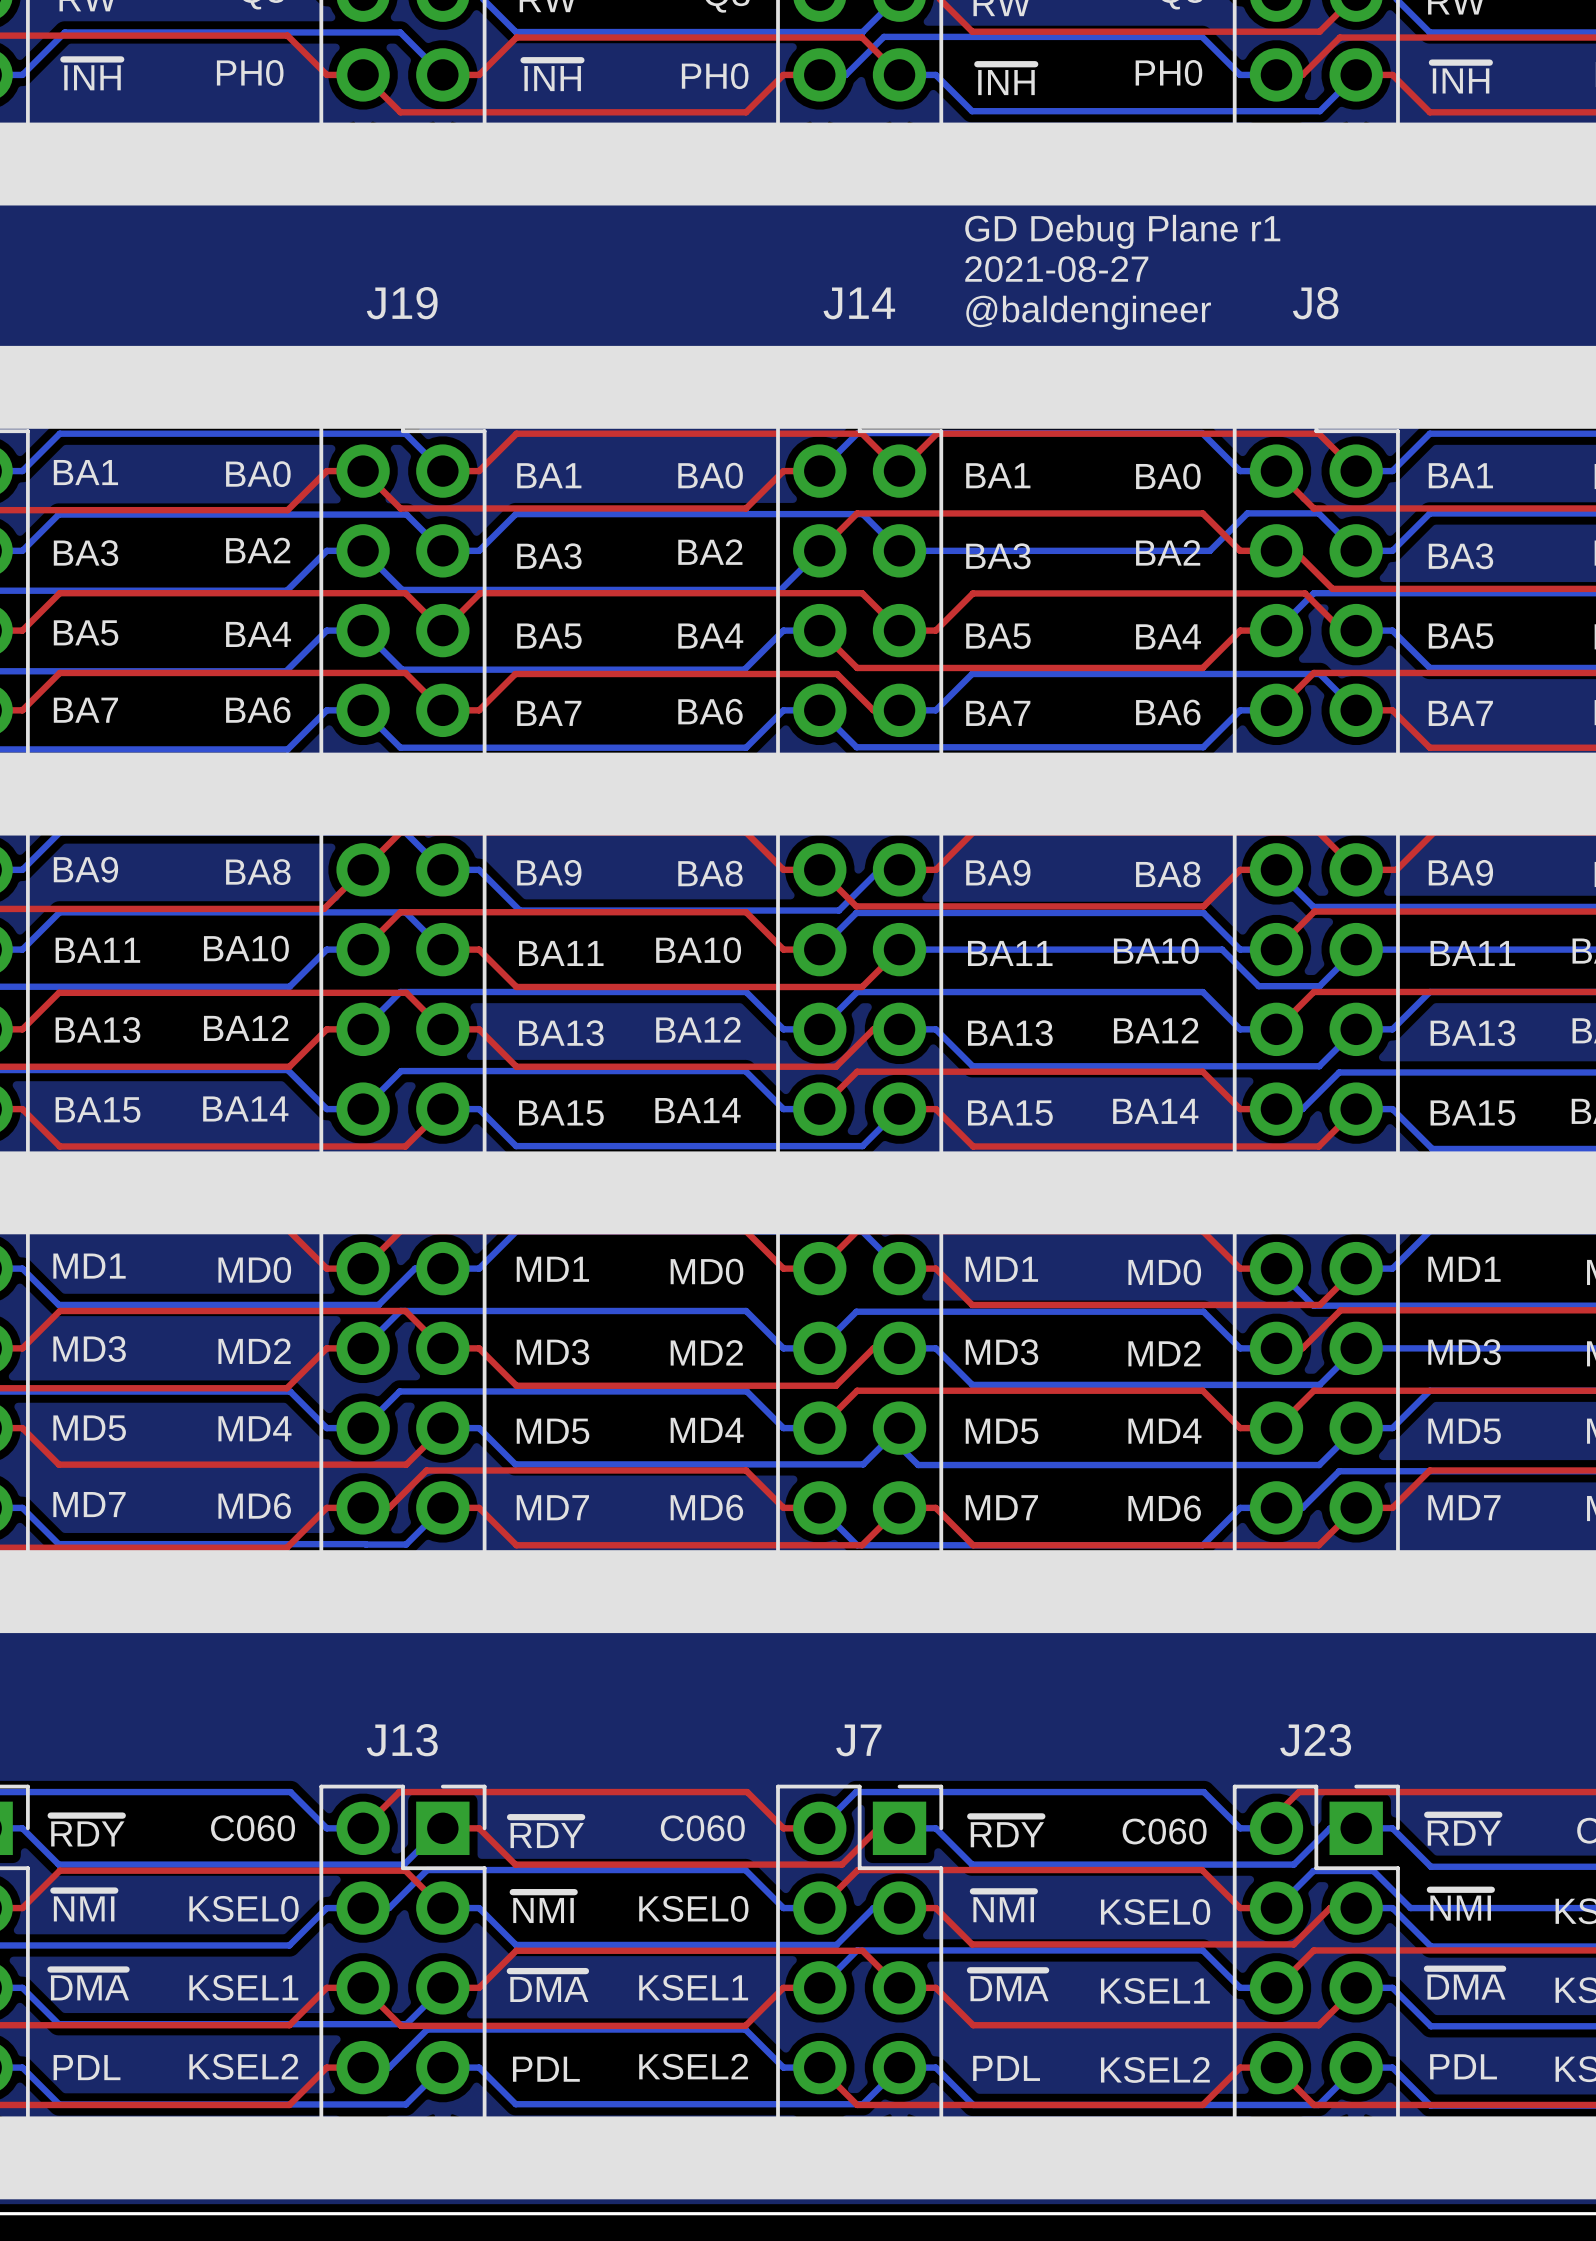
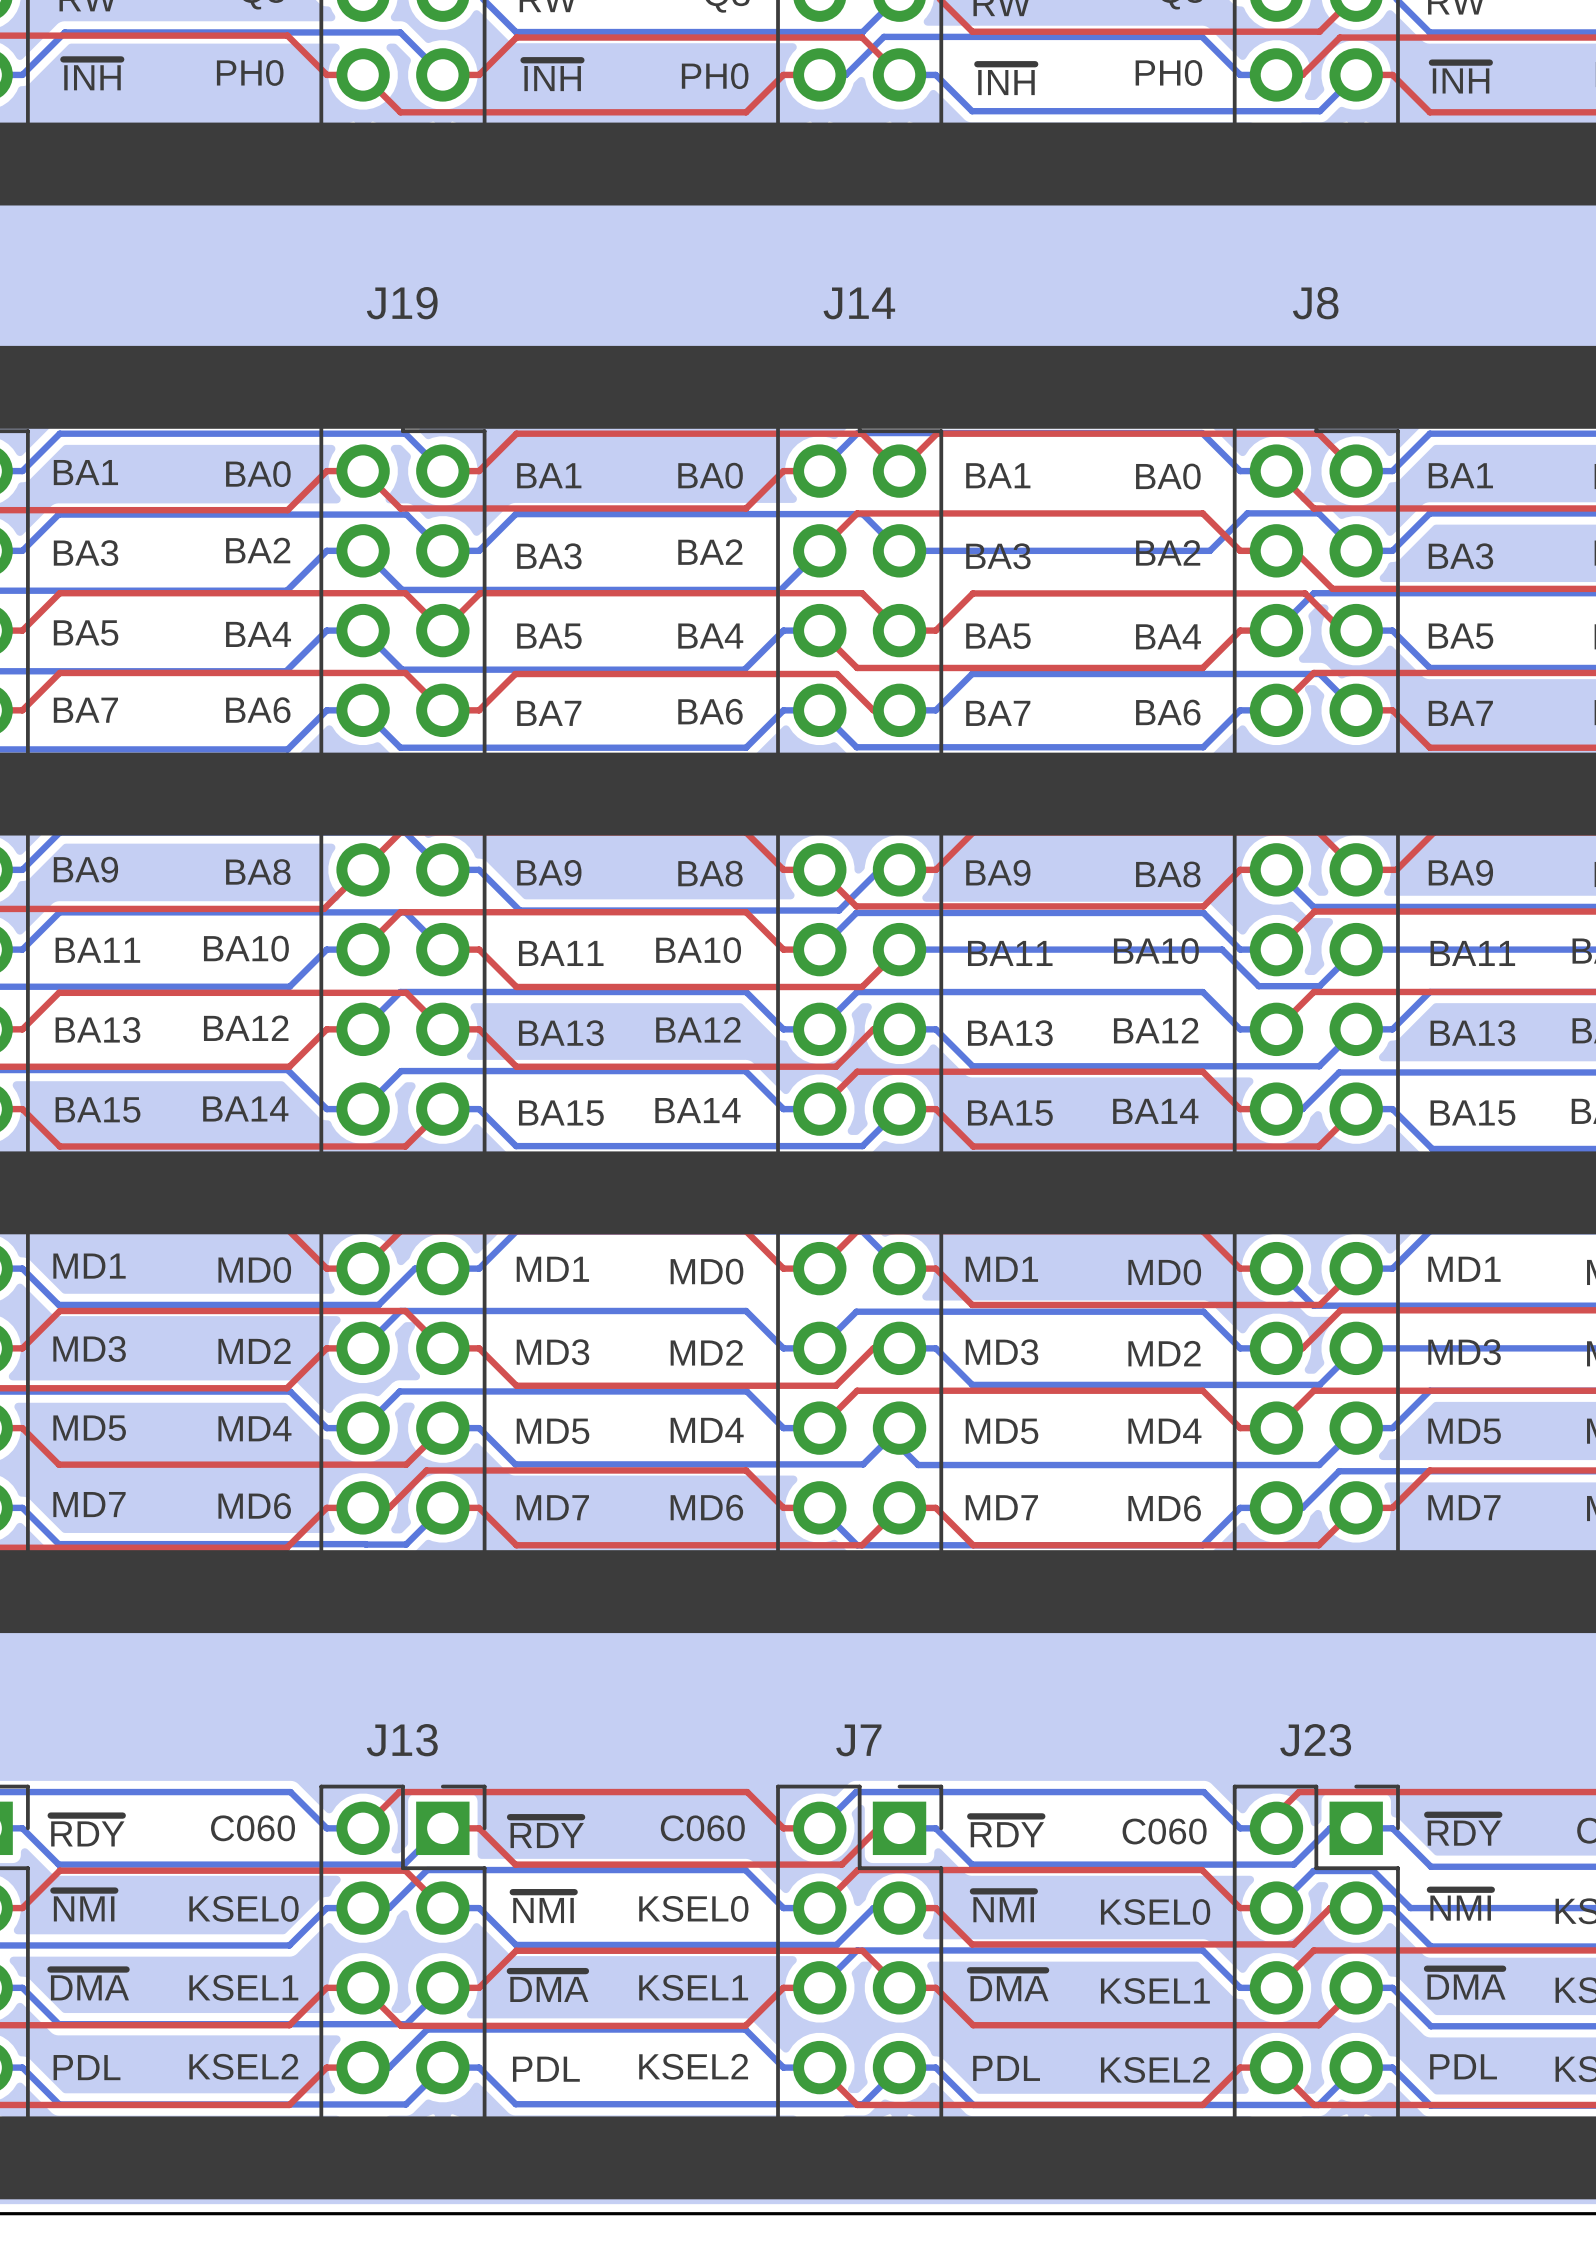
text: GD Debug Plane r1 (1122, 231) -> none
text: 2021-08-27 (1056, 269) -> none
text: @baldengineer (1088, 312) -> none

